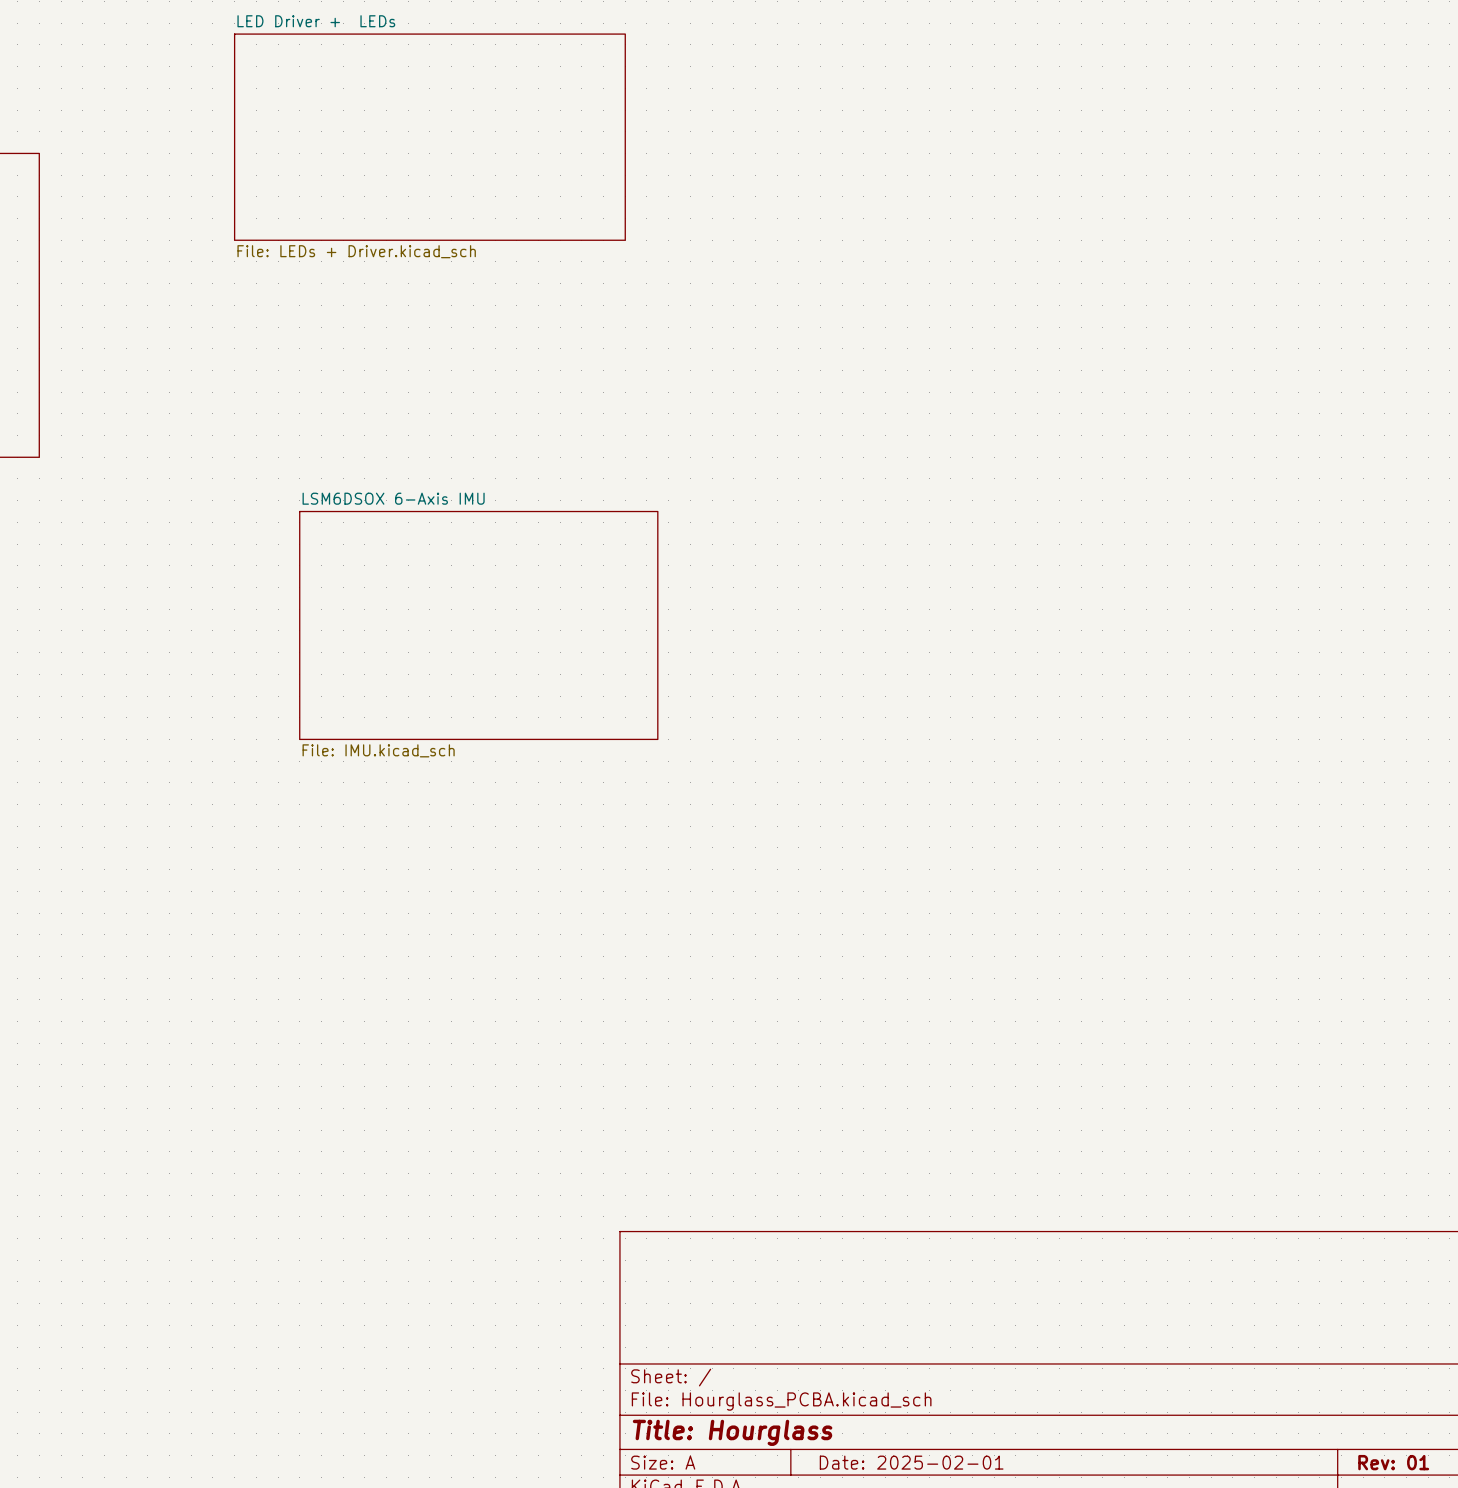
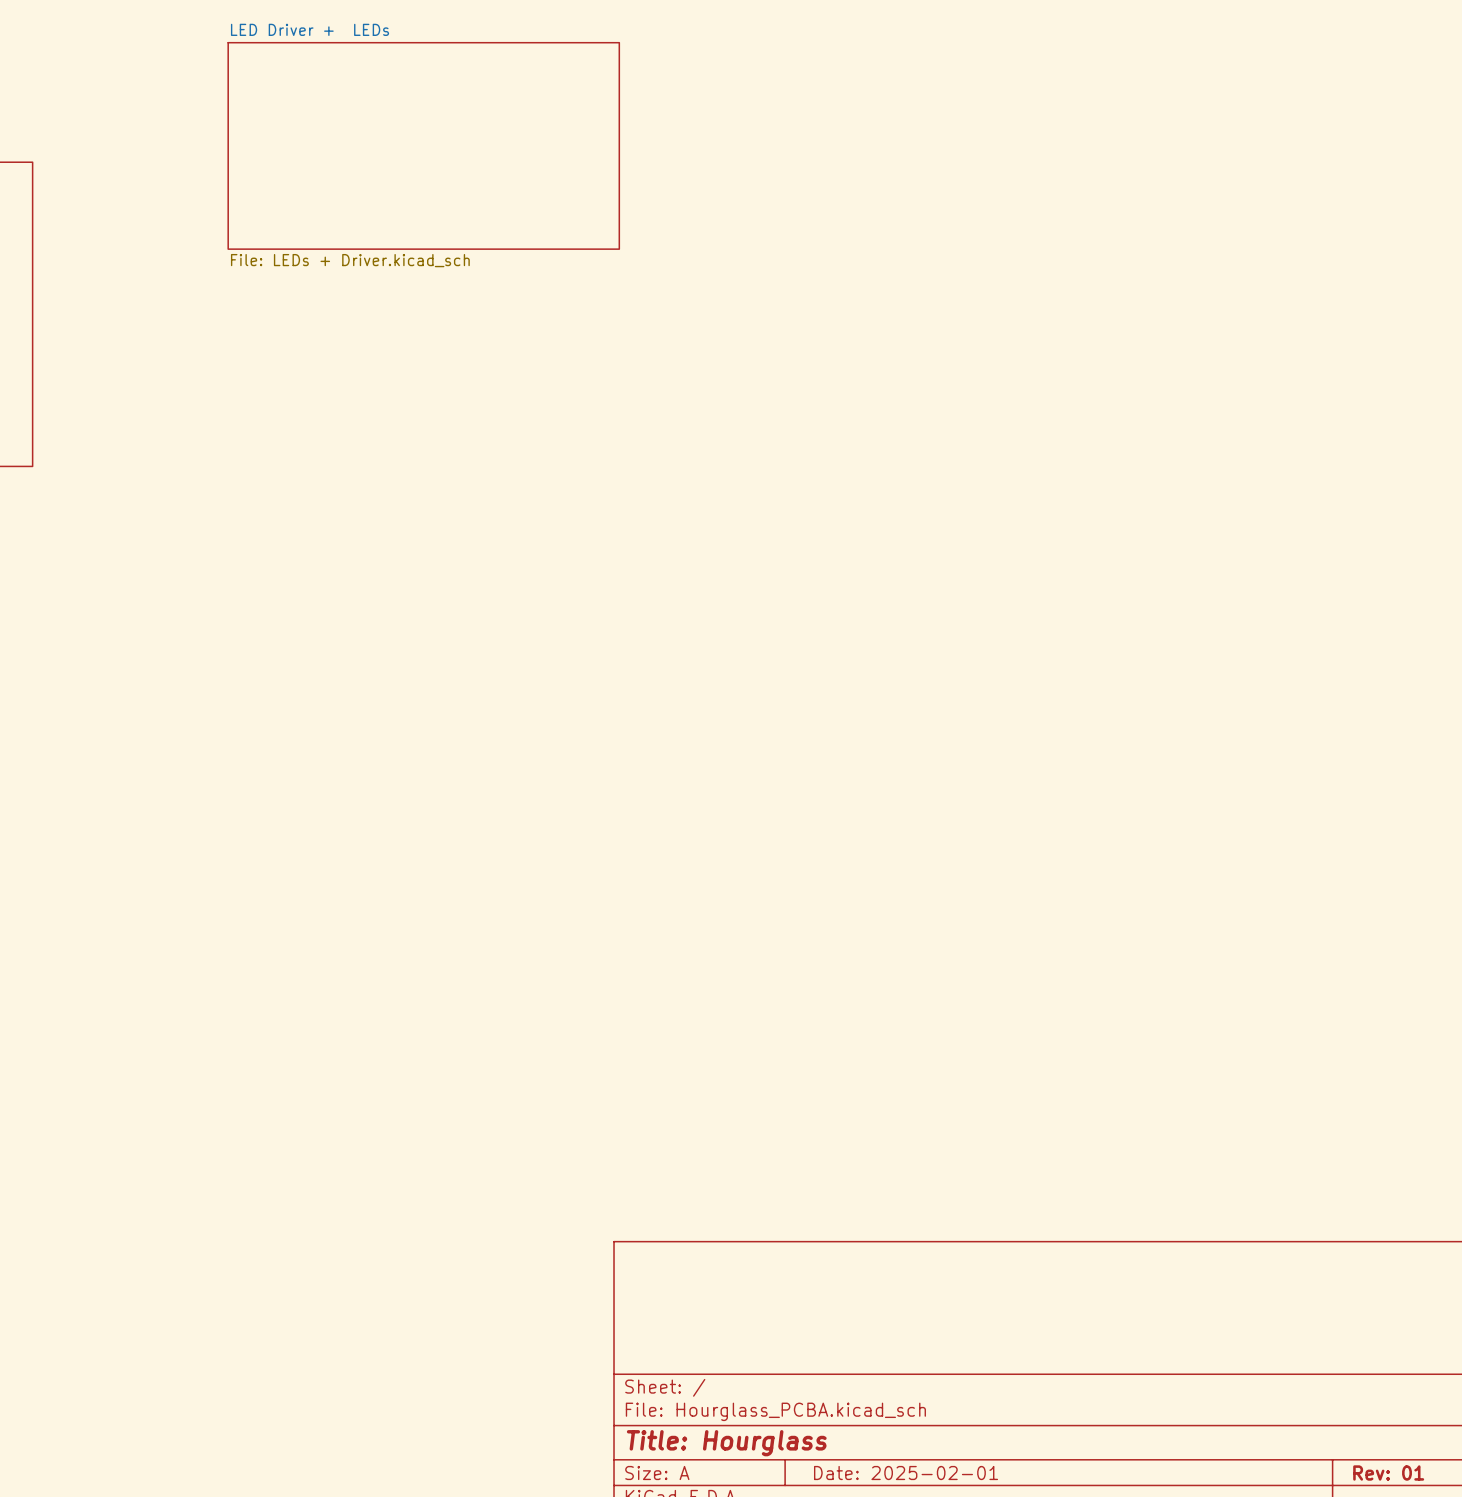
sheet LSM6DSOX 6-Axis IMU: File: IMU.kicad_sch (478, 625) -> none

